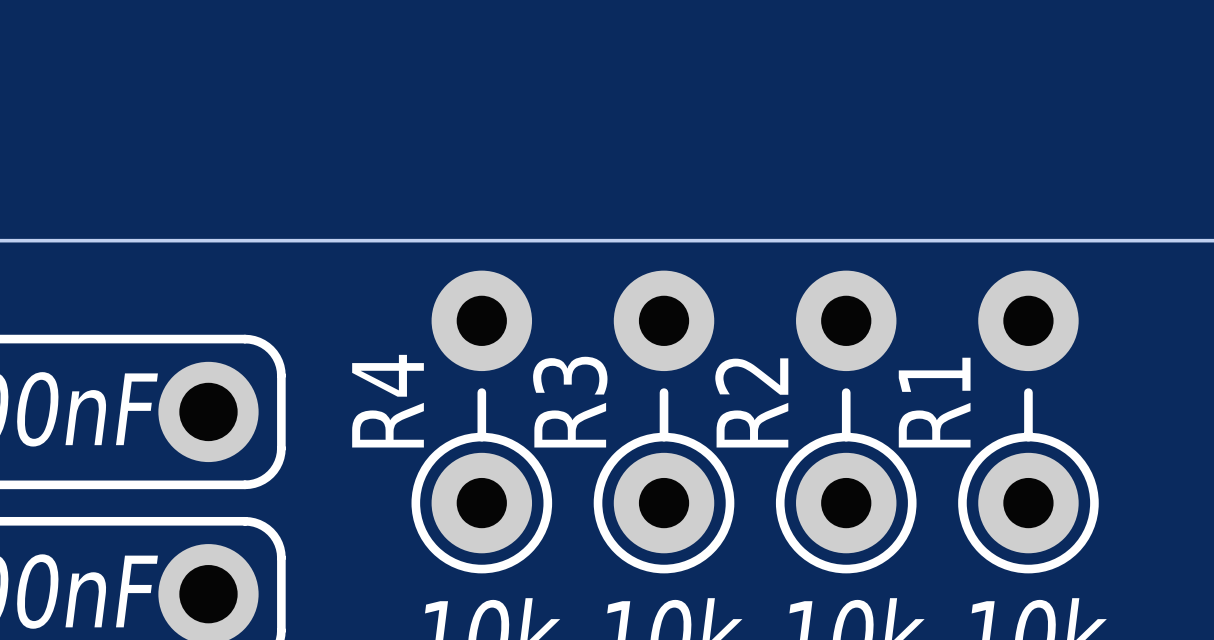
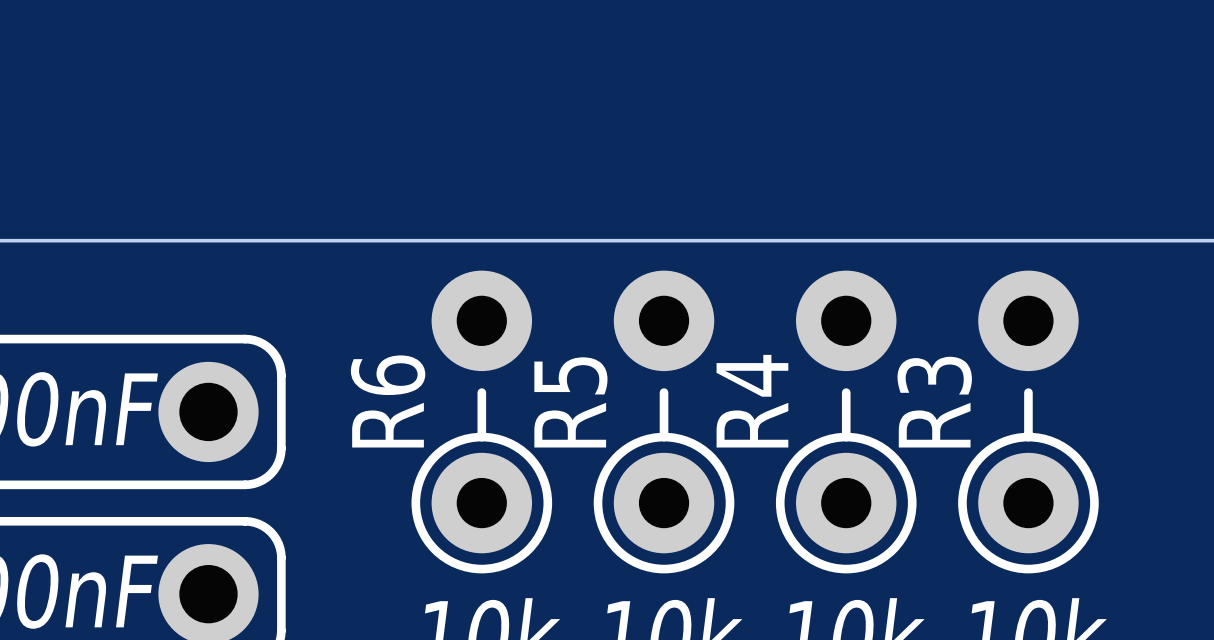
R4 name: R4 (388, 401) -> R6 (388, 401)
R3 name: R3 (570, 402) -> R5 (570, 402)
R2 name: R2 (751, 402) -> R4 (752, 401)
R1 name: R1 (934, 402) -> R3 (934, 402)

